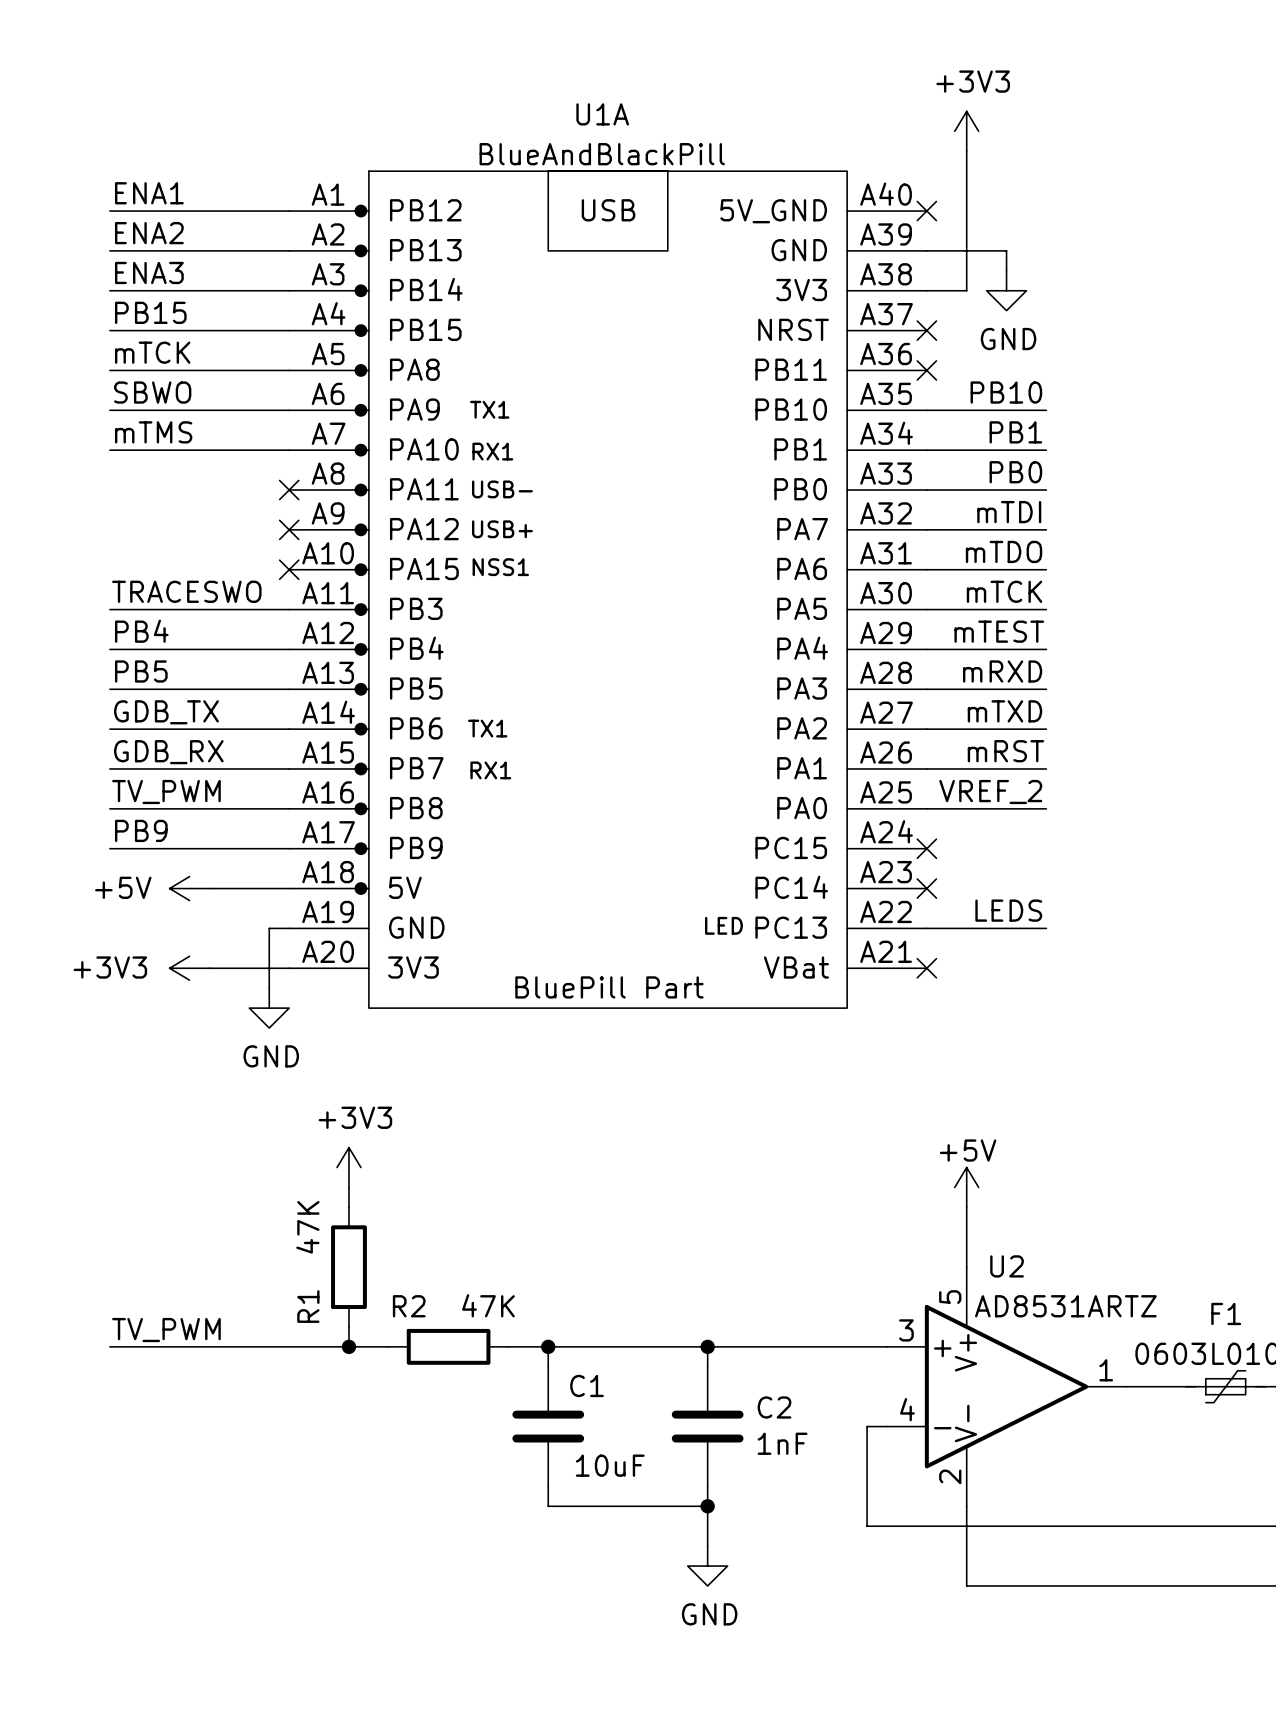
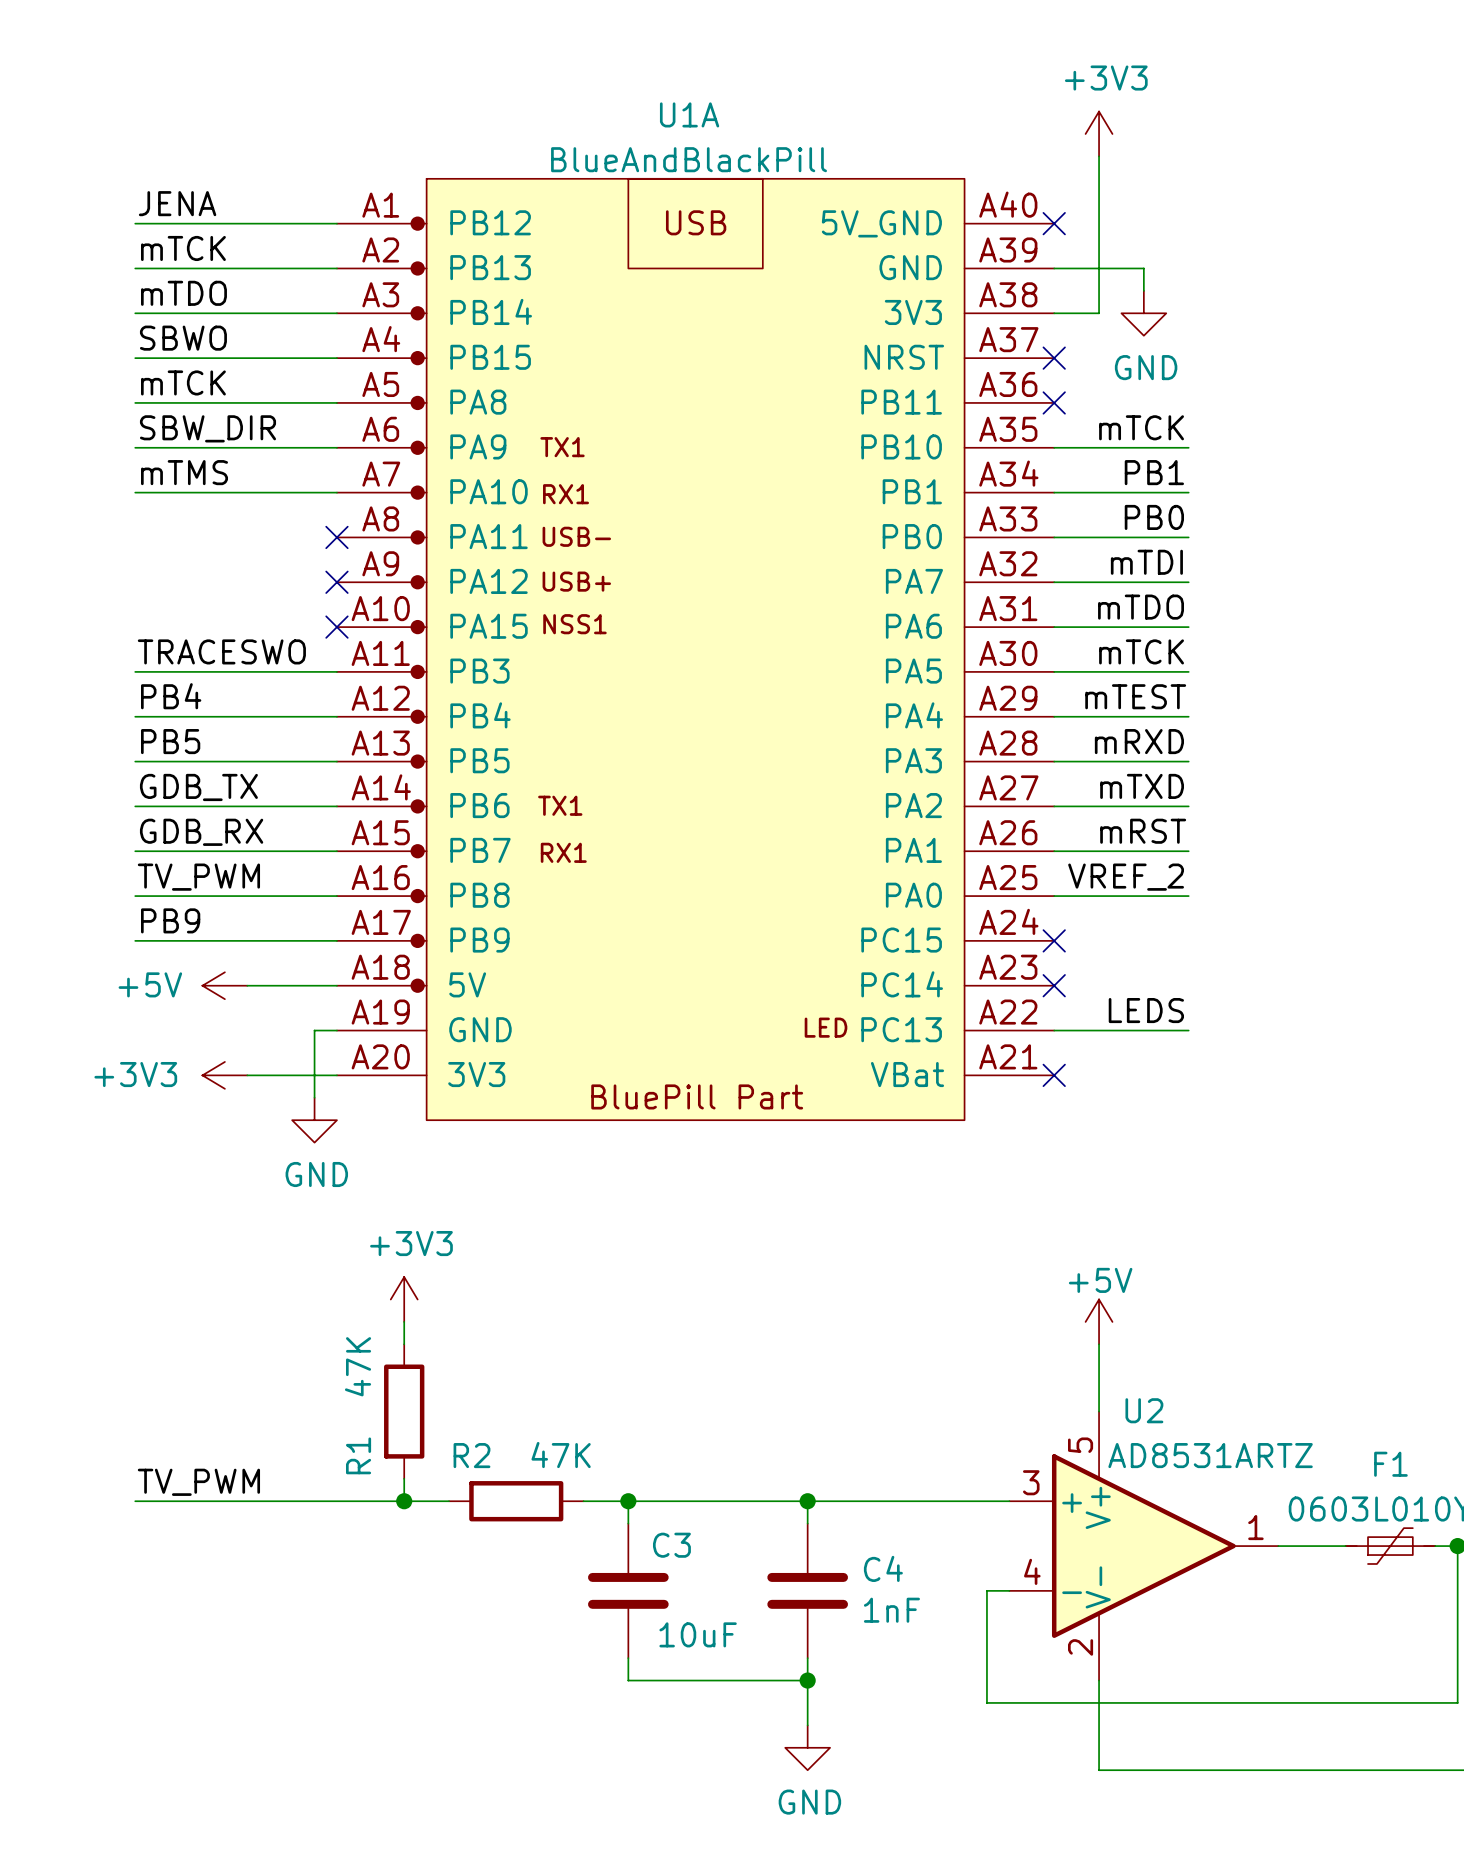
label: ENA1 (149, 193) -> JENA (177, 203)
label: ENA2 (149, 233) -> mTCK (183, 248)
label: ENA3 (149, 272) -> mTDO (183, 293)
label: PB15 (150, 312) -> SBWO (183, 338)
label: SBWO (152, 392) -> SBW_DIR (207, 428)
label: PB10 (1006, 392) -> mTCK (1141, 427)
C1 name: C1 (586, 1385) -> C3 (671, 1545)
C2 name: C2 (774, 1407) -> C4 (883, 1568)

